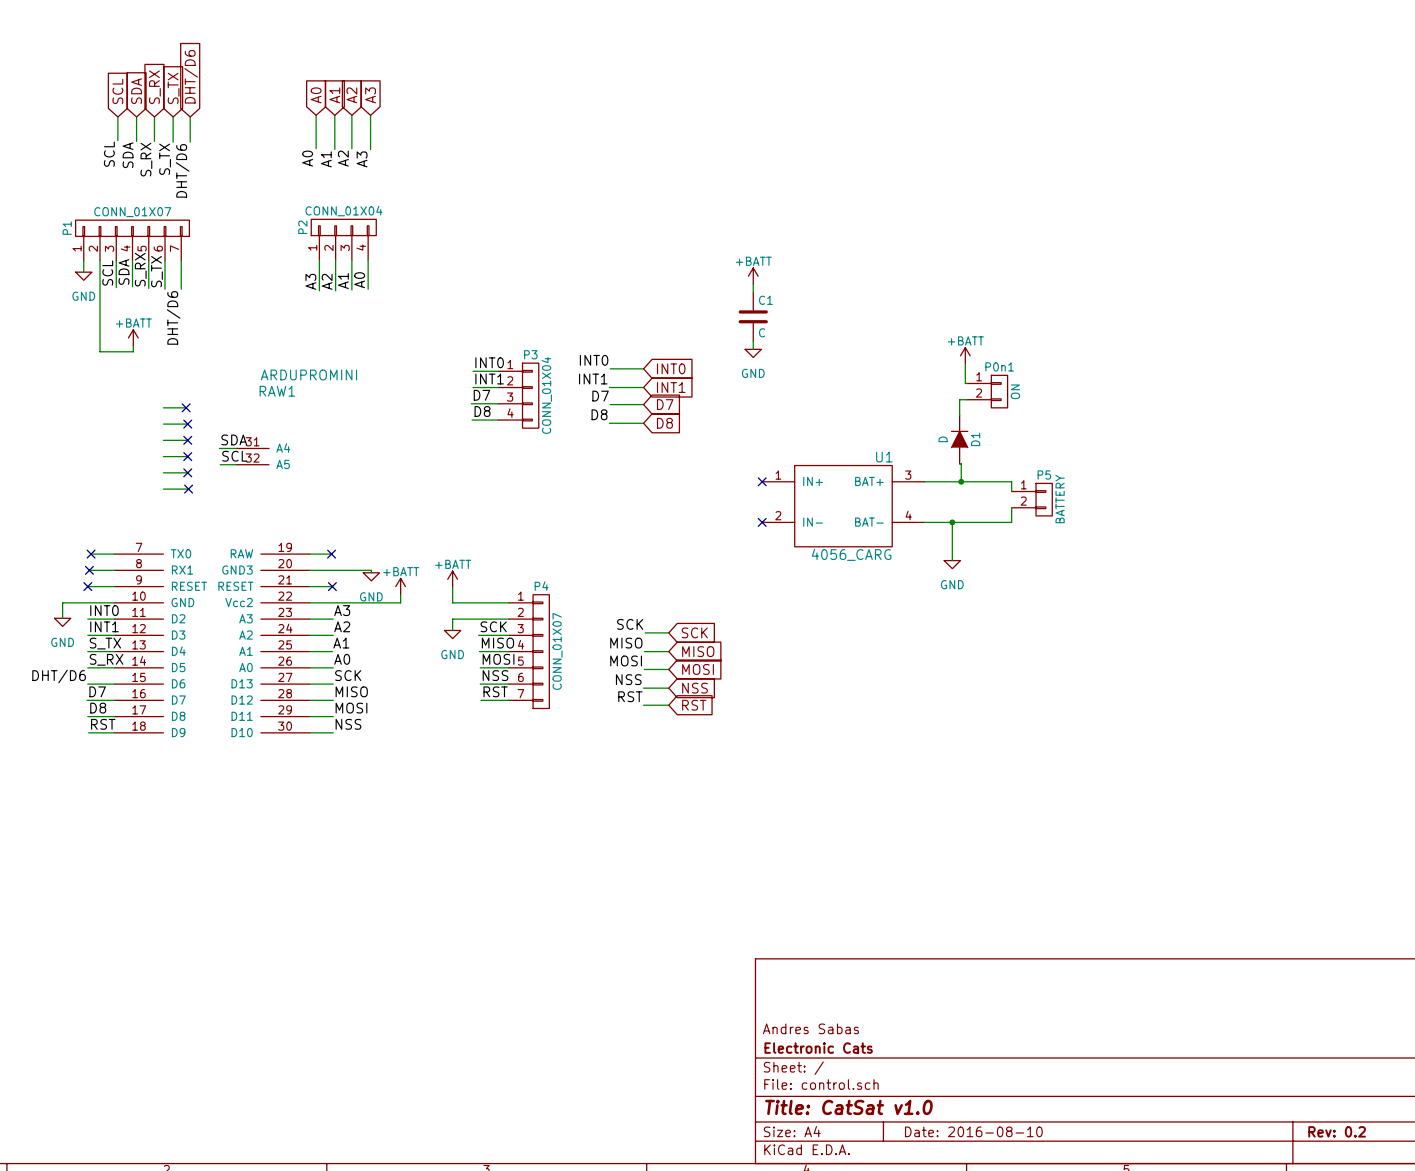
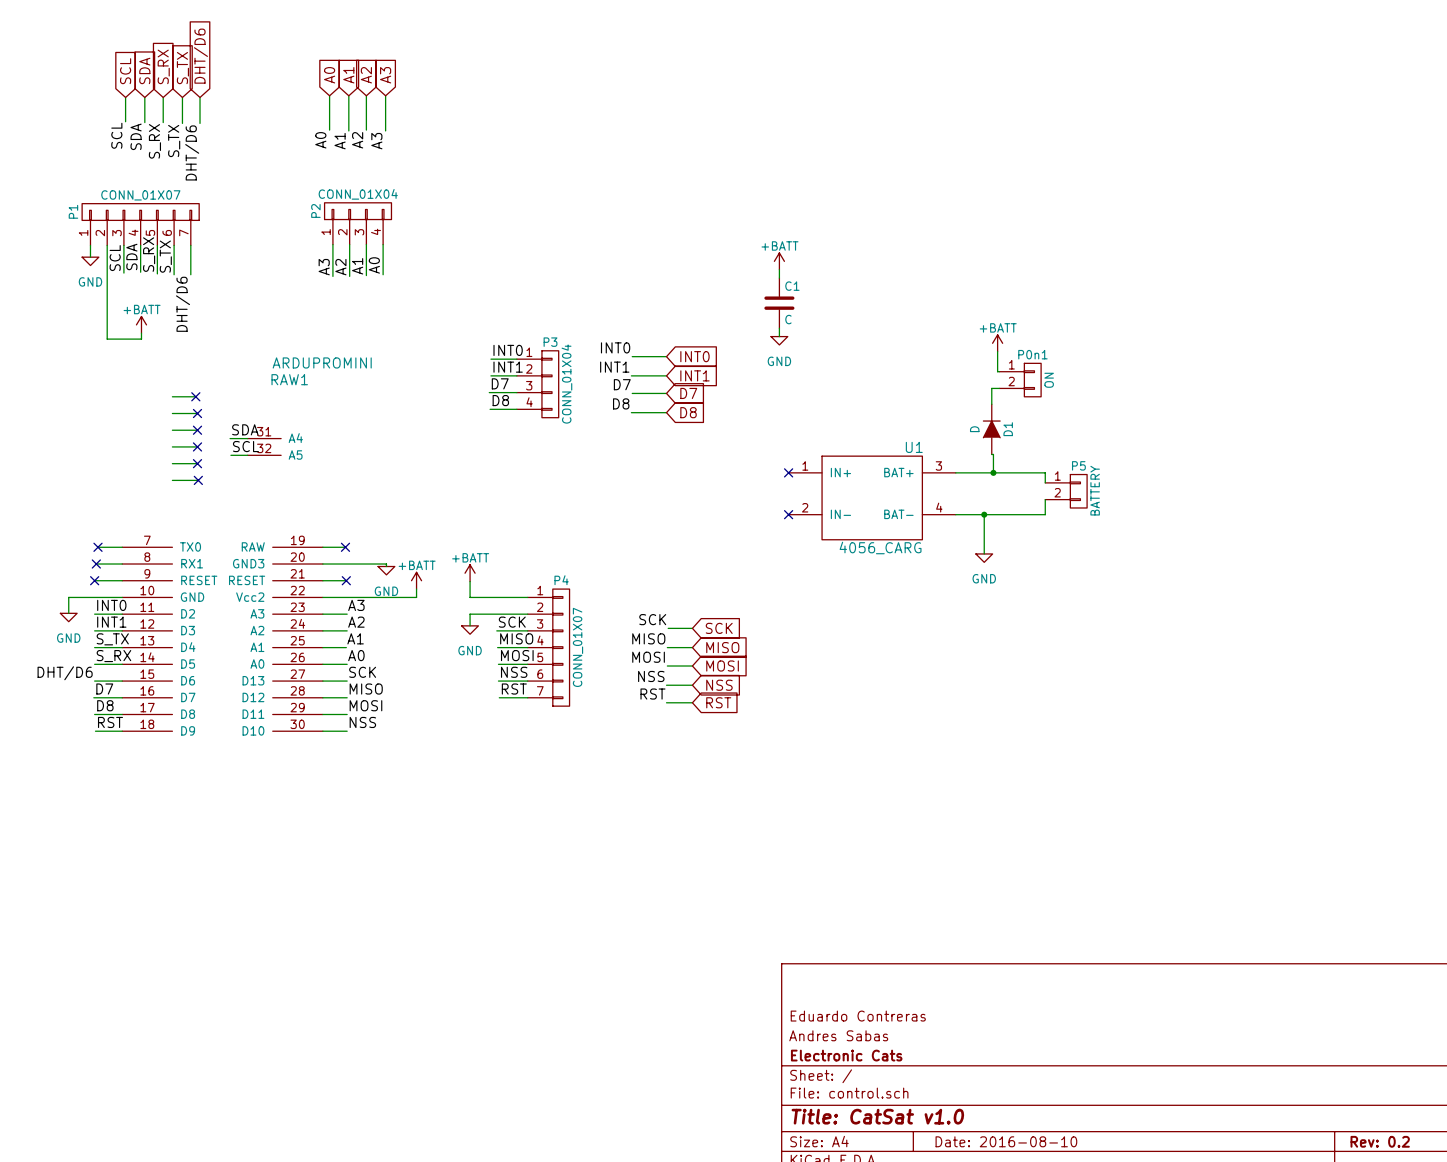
title block: none -> Eduardo Contreras (858, 1016)

